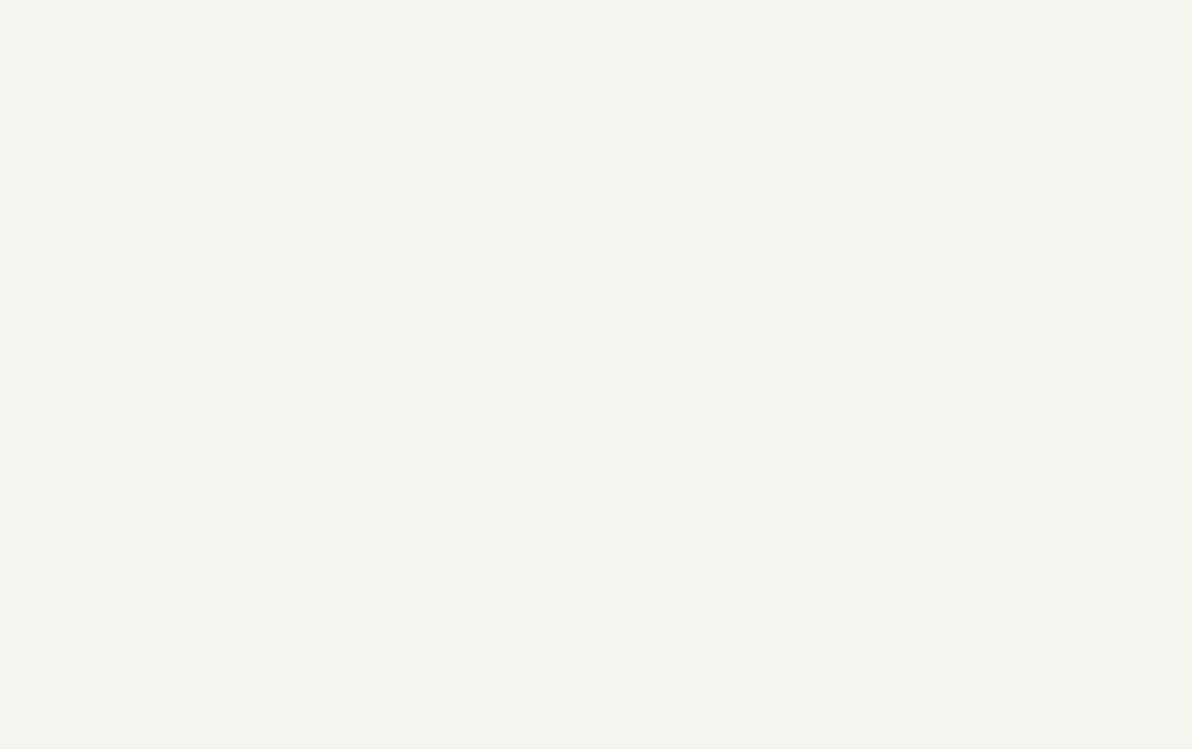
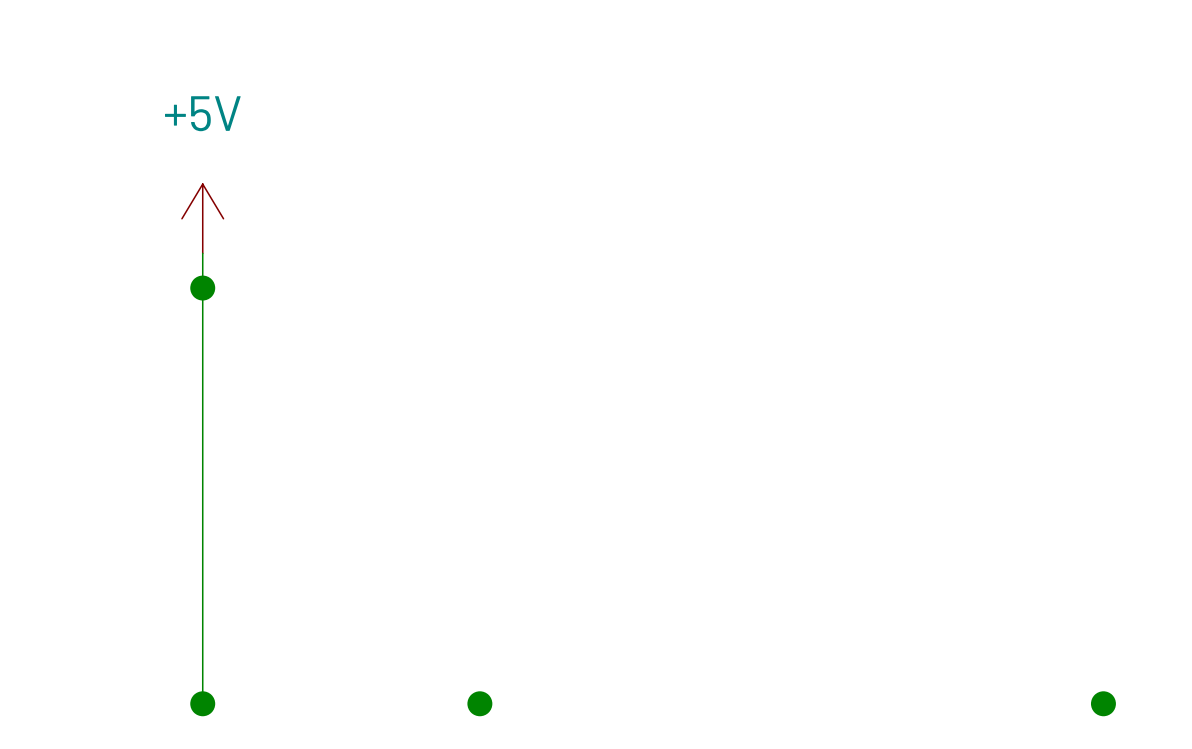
power symbol: none -> +5V (202, 218)
wire: none -> (202, 253) (202, 703)
junction: none -> (202, 288)
junction: none -> (202, 703)
junction: none -> (479, 703)
junction: none -> (1103, 703)

